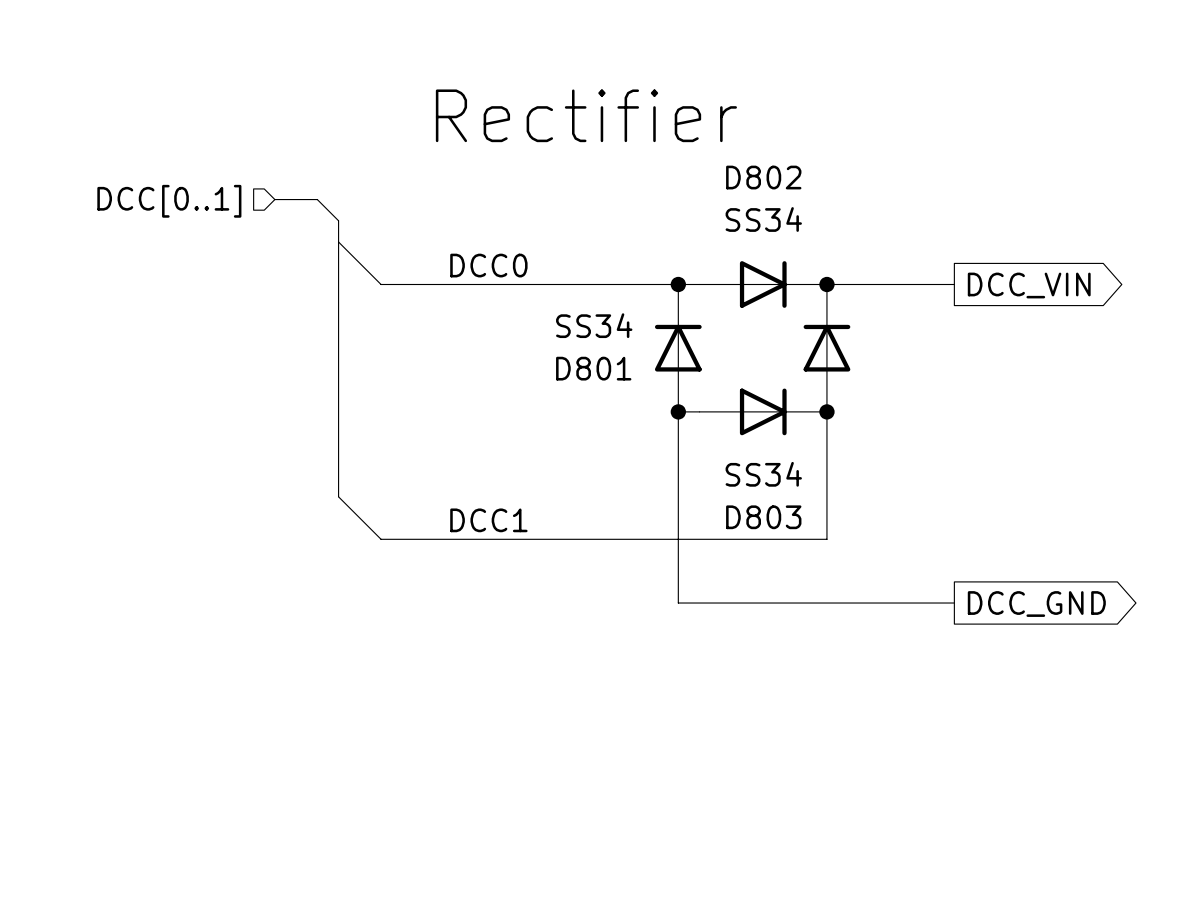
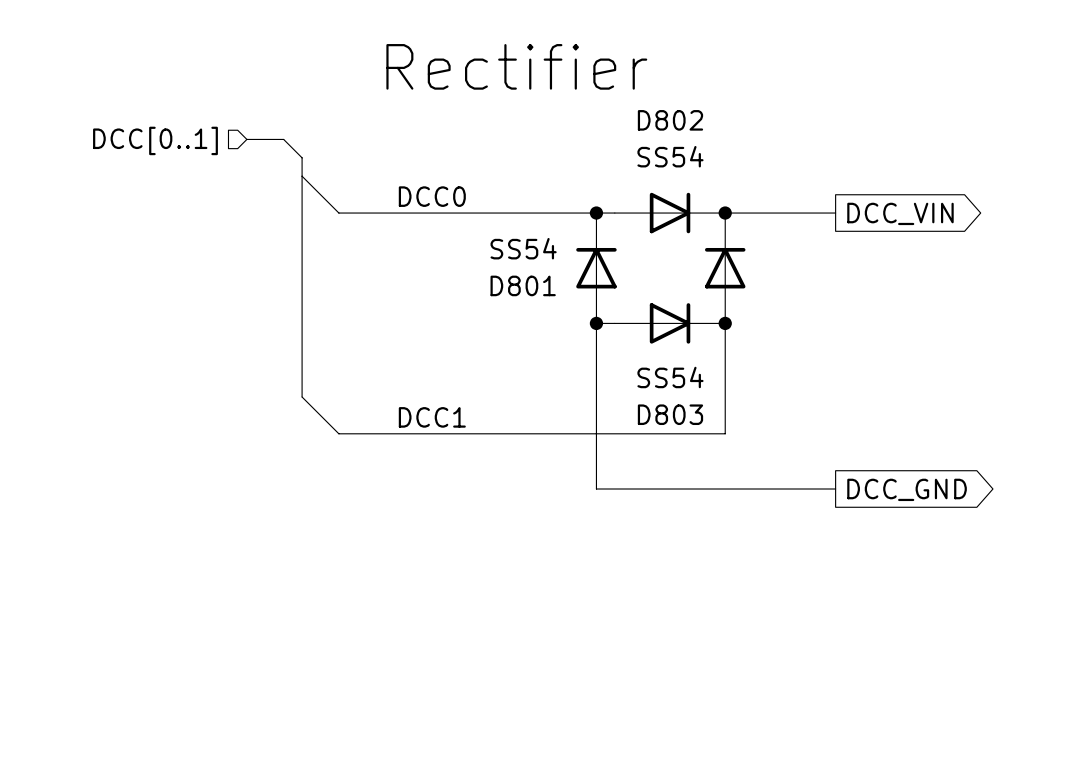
D802 value: SS34 (763, 219) -> SS54 (670, 156)
D801 value: SS34 (594, 325) -> SS54 (523, 248)
D803 value: SS34 (763, 474) -> SS54 (670, 377)

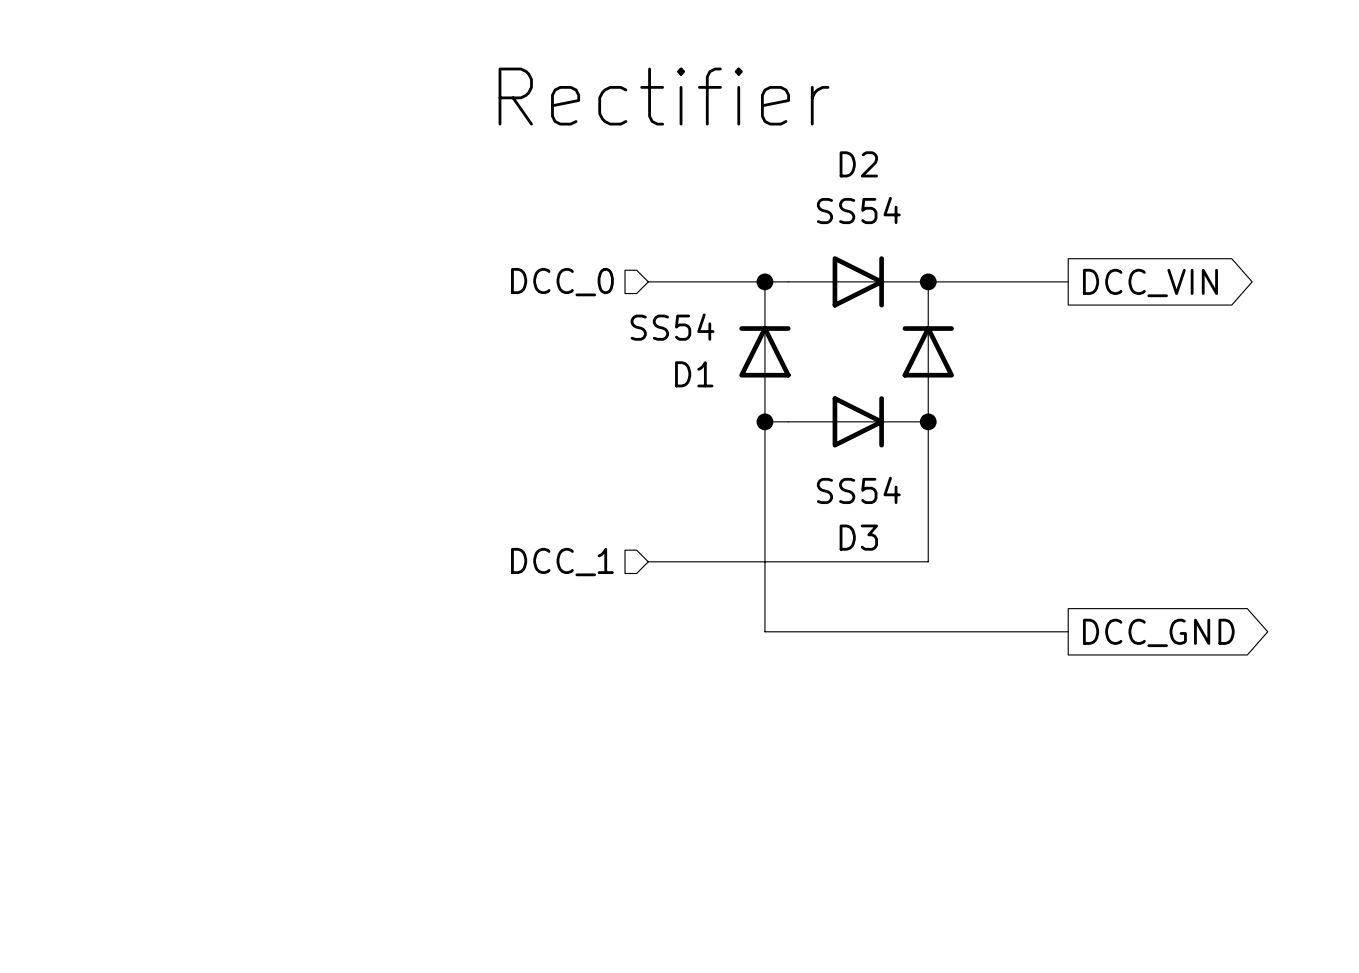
D802 name: D802 (670, 120) -> D2 (858, 164)
bus: (246, 139) (283, 139) (302, 157) (302, 397) -> none
hierarchical label: DCC[0..1] (155, 140) -> none
wire: (302, 176) (338, 213) (504, 213) -> none
label: DCC0 (432, 196) -> none
hierarchical label: none -> DCC_0 (562, 282)
D801 name: D801 (523, 285) -> D1 (694, 374)
wire: (302, 397) (338, 433) (504, 433) -> none
D803 name: D803 (670, 414) -> D3 (858, 537)
label: DCC1 (432, 417) -> none
hierarchical label: none -> DCC_1 (562, 562)

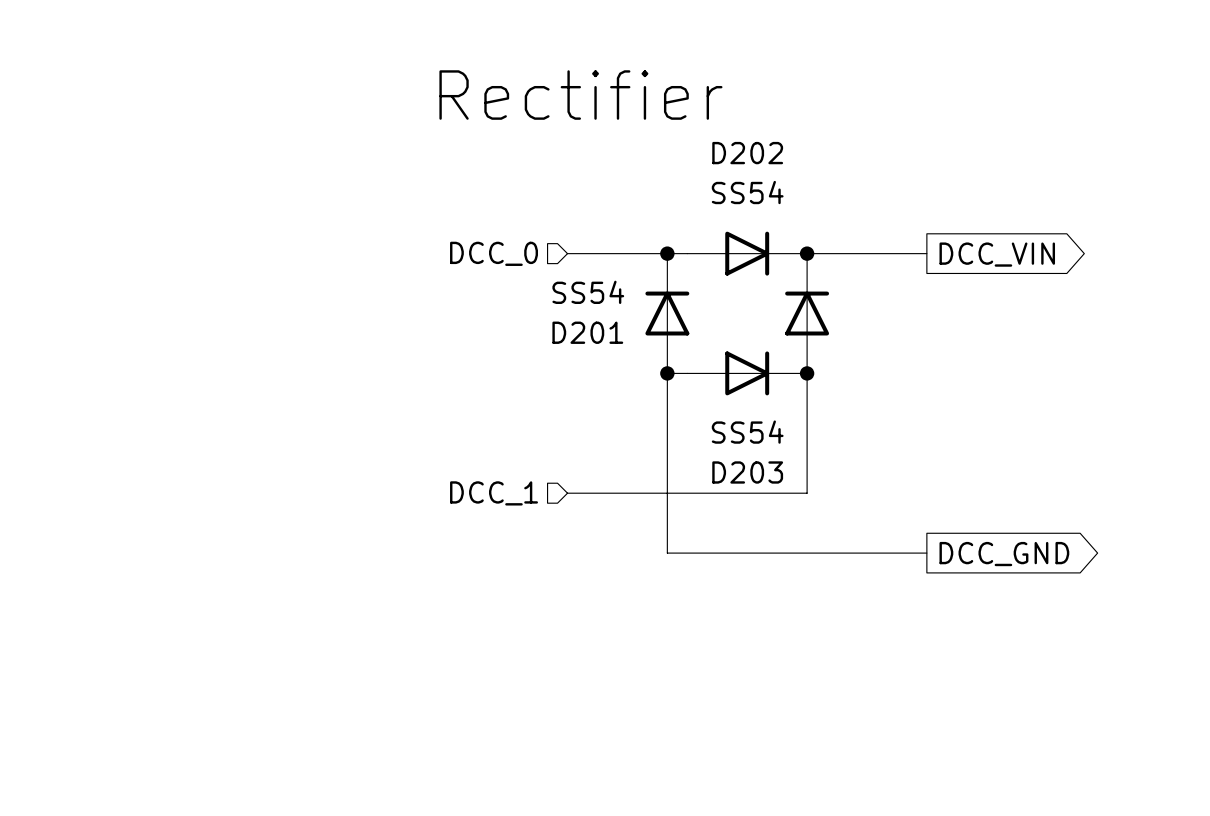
D2 name: D2 (858, 164) -> D202 (747, 153)
D1 name: D1 (694, 374) -> D201 (587, 332)
D3 name: D3 (858, 537) -> D203 (747, 472)

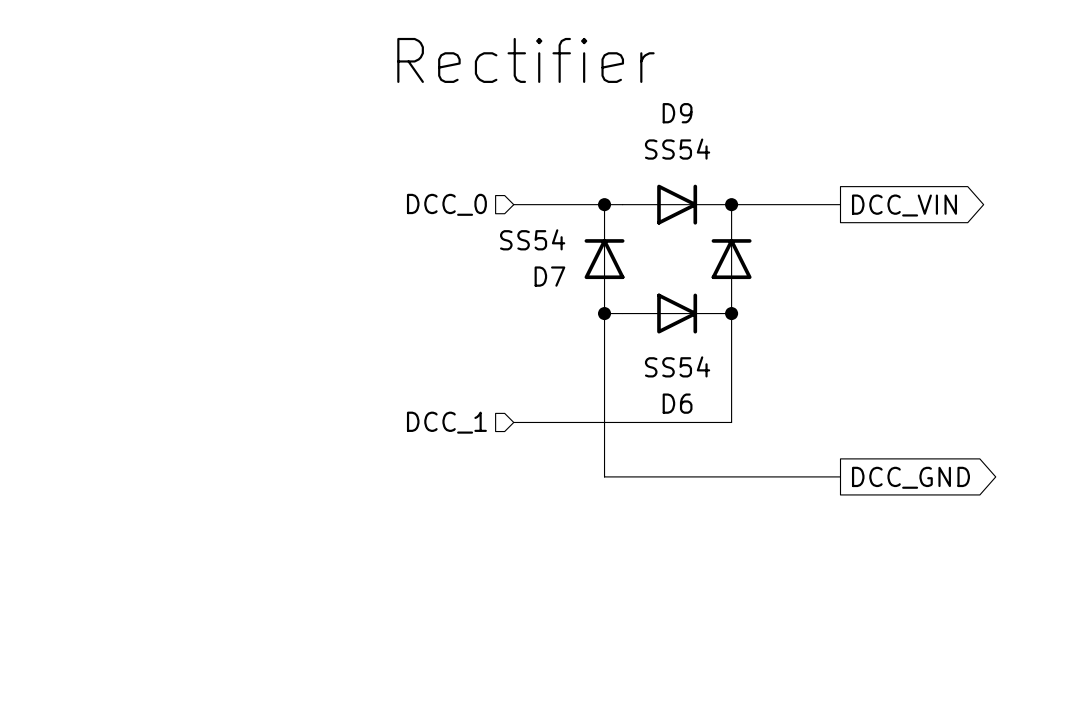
D202 name: D202 (747, 153) -> D9 (677, 113)
D201 name: D201 (587, 332) -> D7 (549, 276)
D203 name: D203 (747, 472) -> D6 (677, 403)

